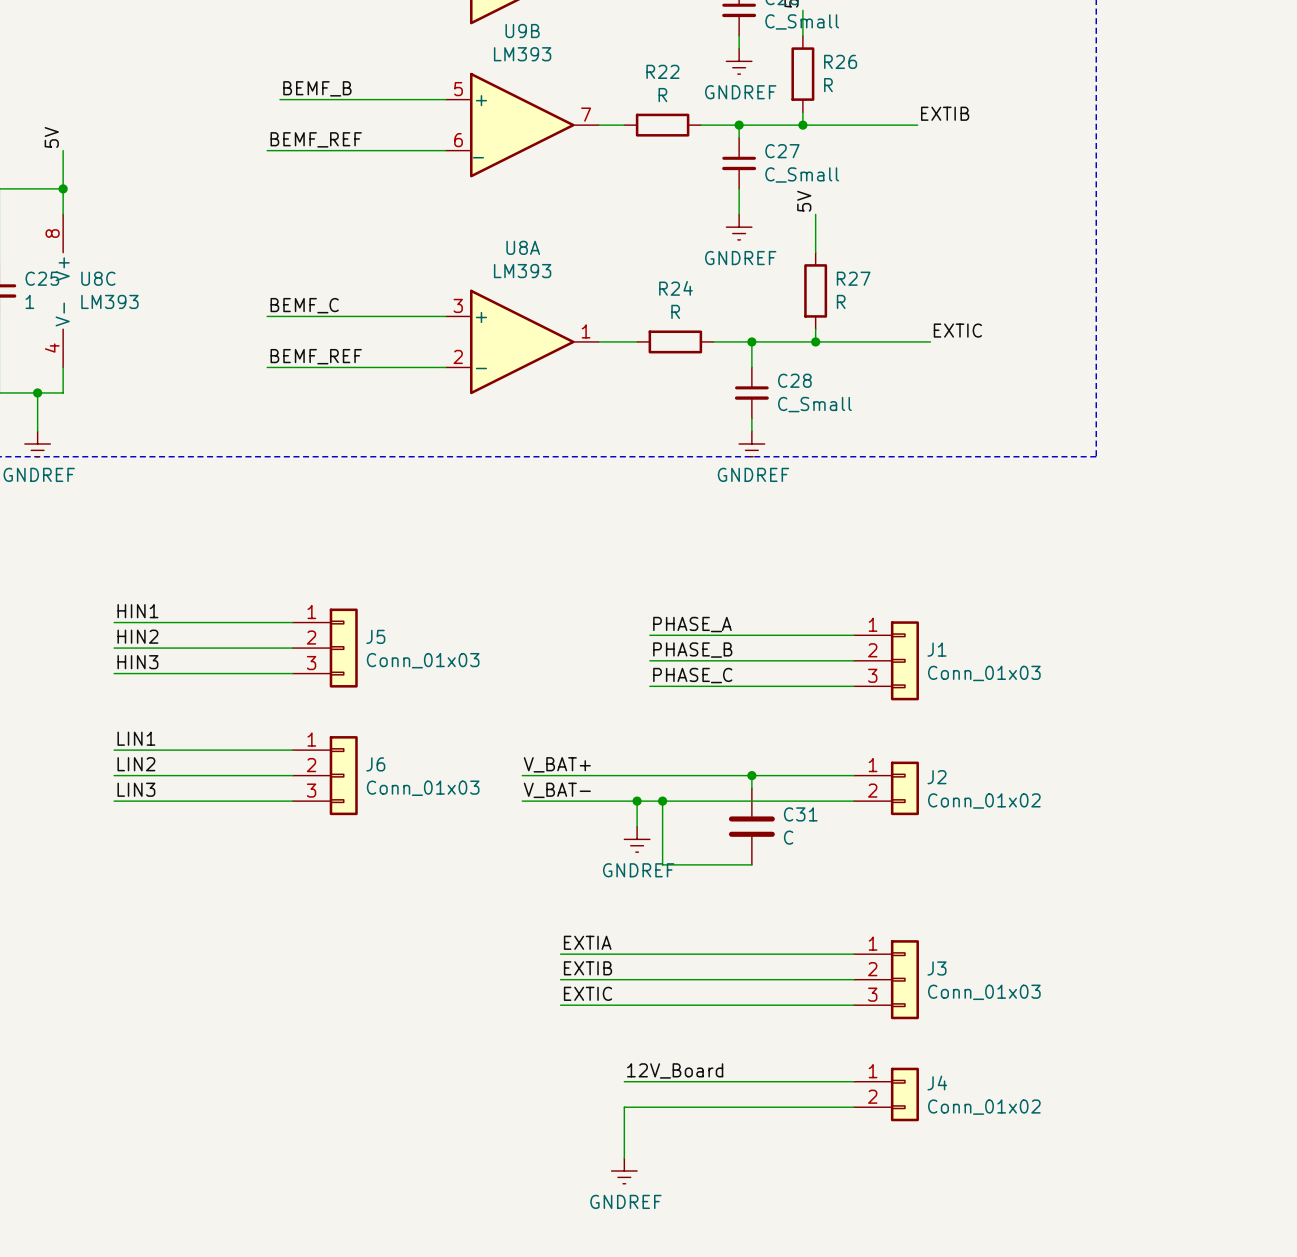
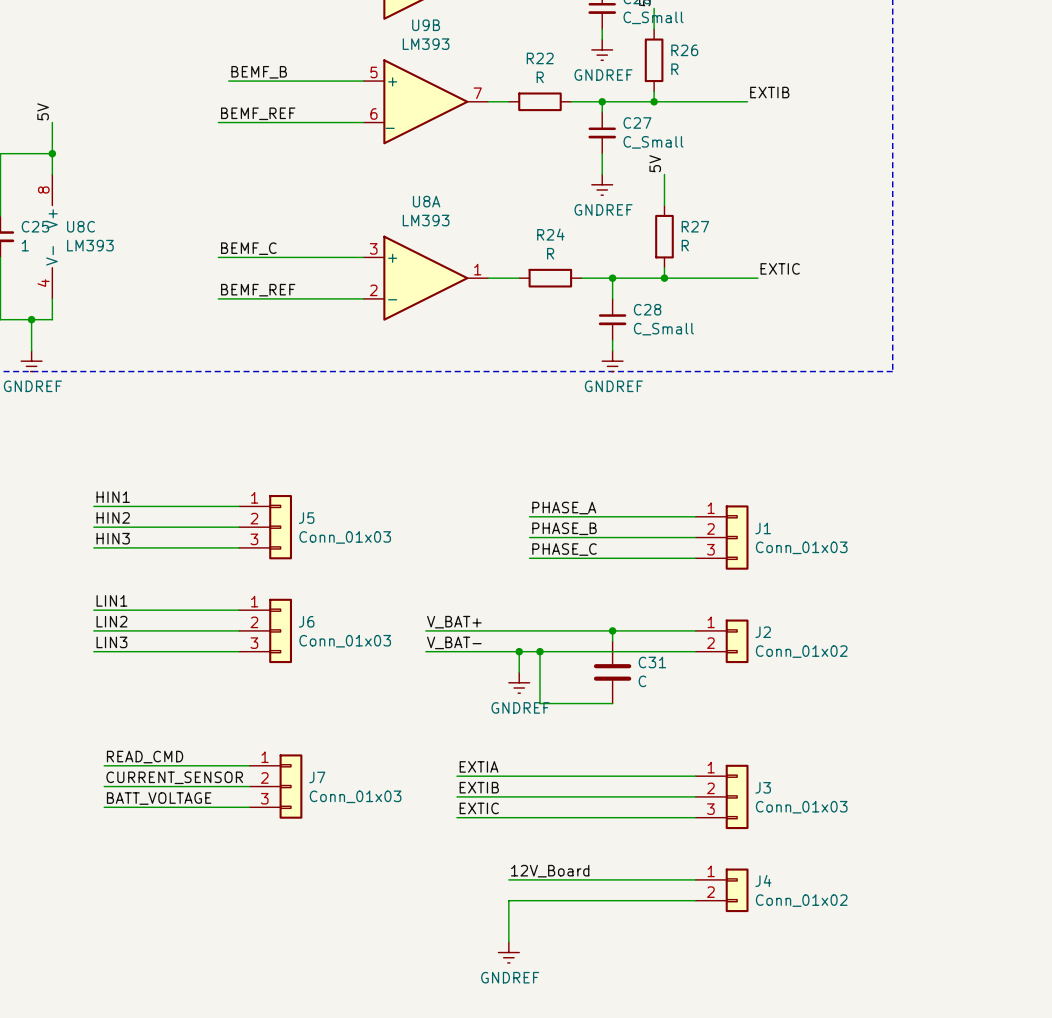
label: none -> READ_CMD (145, 757)
wire: none -> (104, 765) (249, 765)
label: none -> CURRENT_SENSOR (174, 777)
wire: none -> (104, 786) (249, 786)
J7: none -> Conn_01x03 (275, 786)
label: none -> BATT_VOLTAGE (159, 798)
wire: none -> (104, 807) (249, 807)

